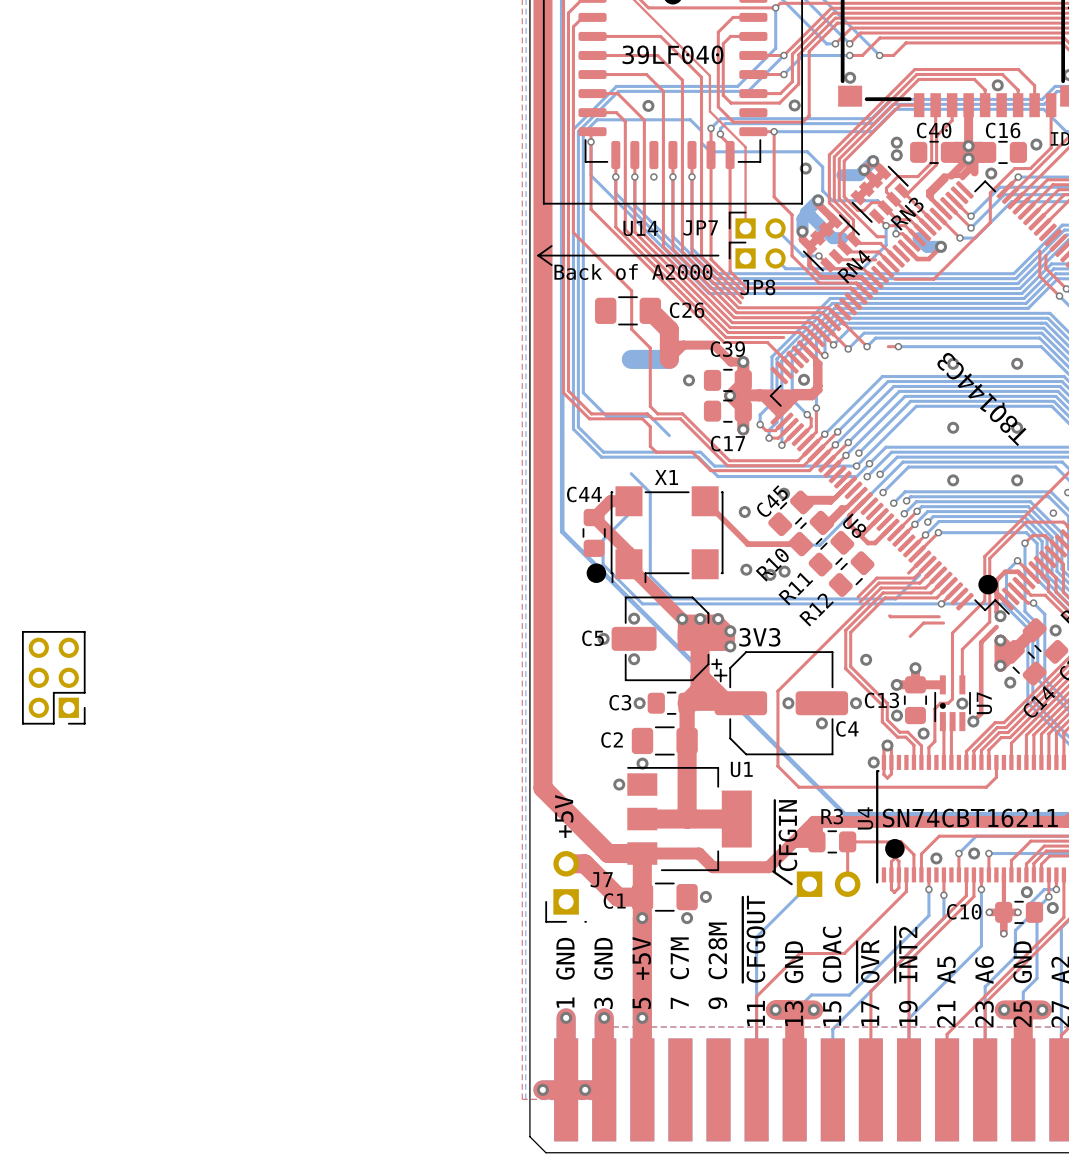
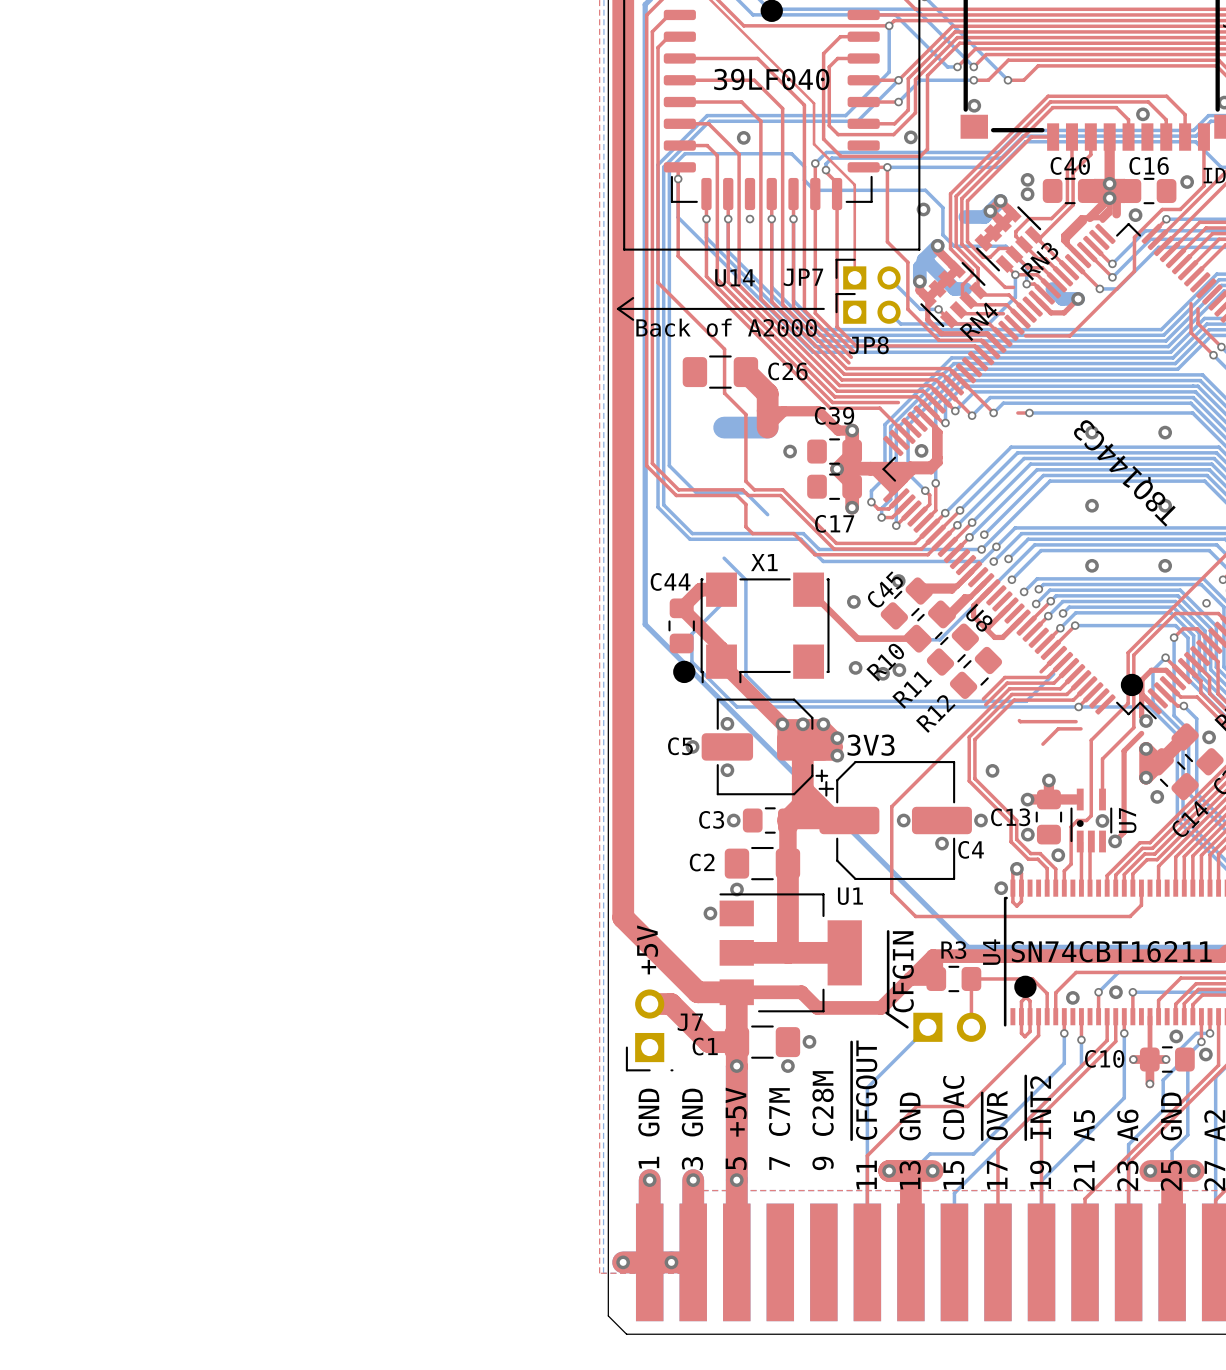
part: (53, 677) -> none

